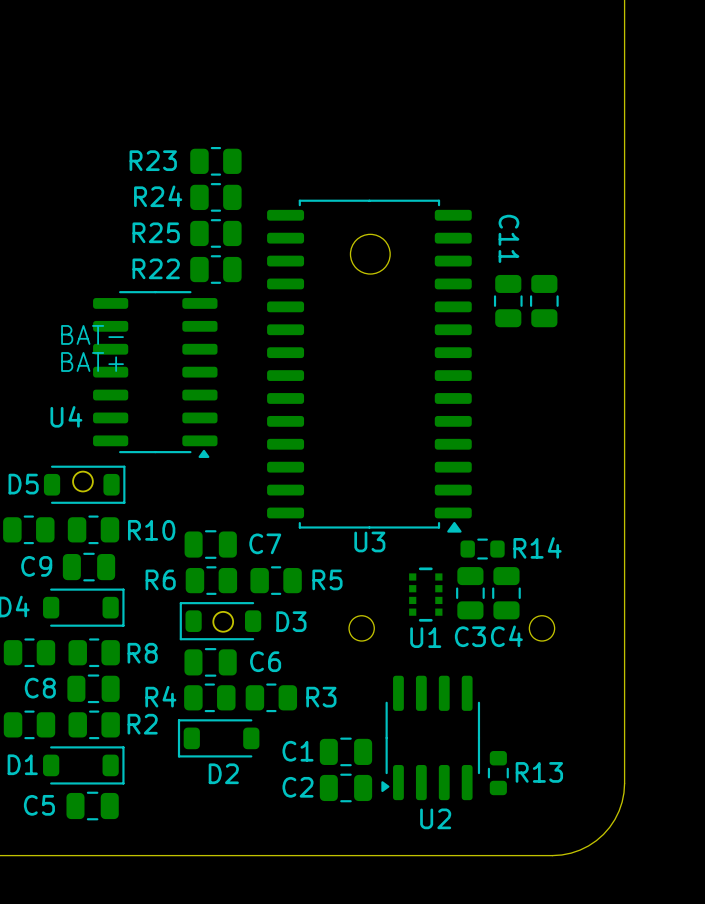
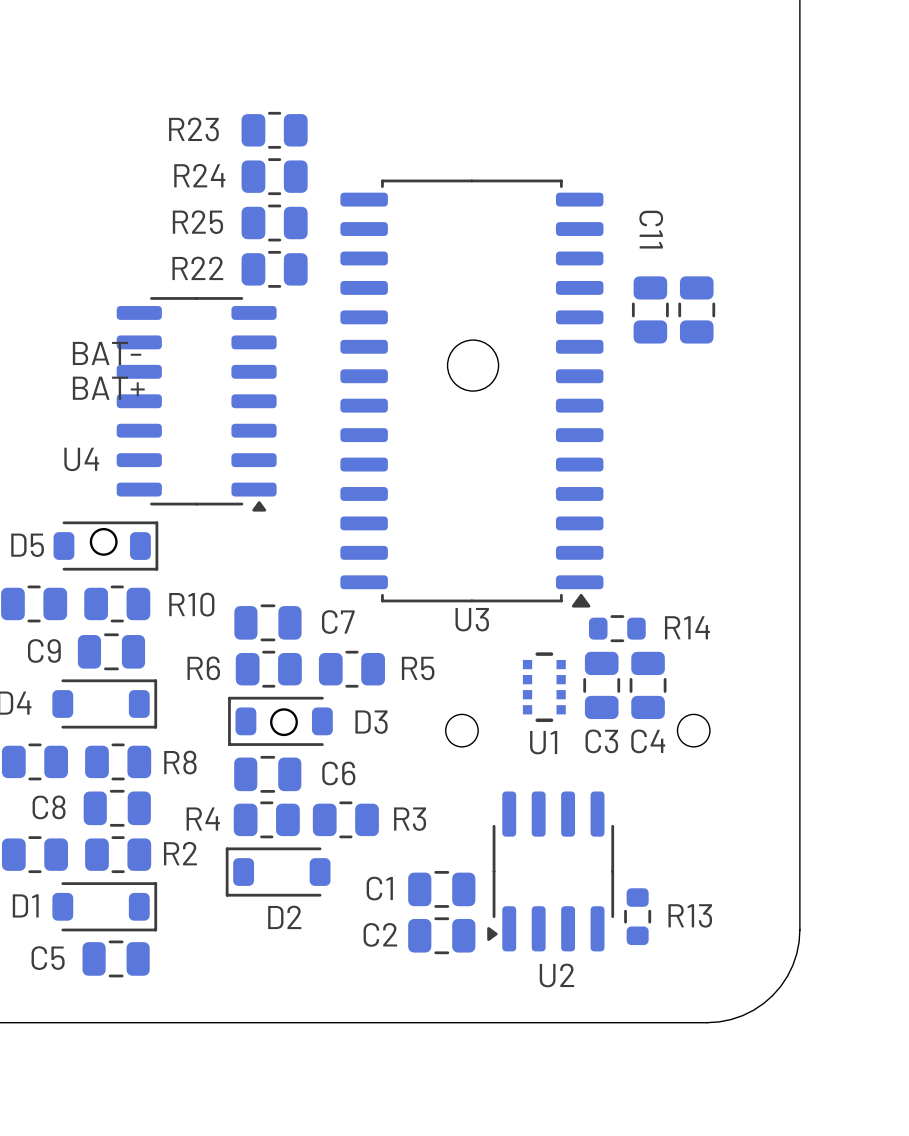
round board edge position: (370, 254) -> (473, 365)

